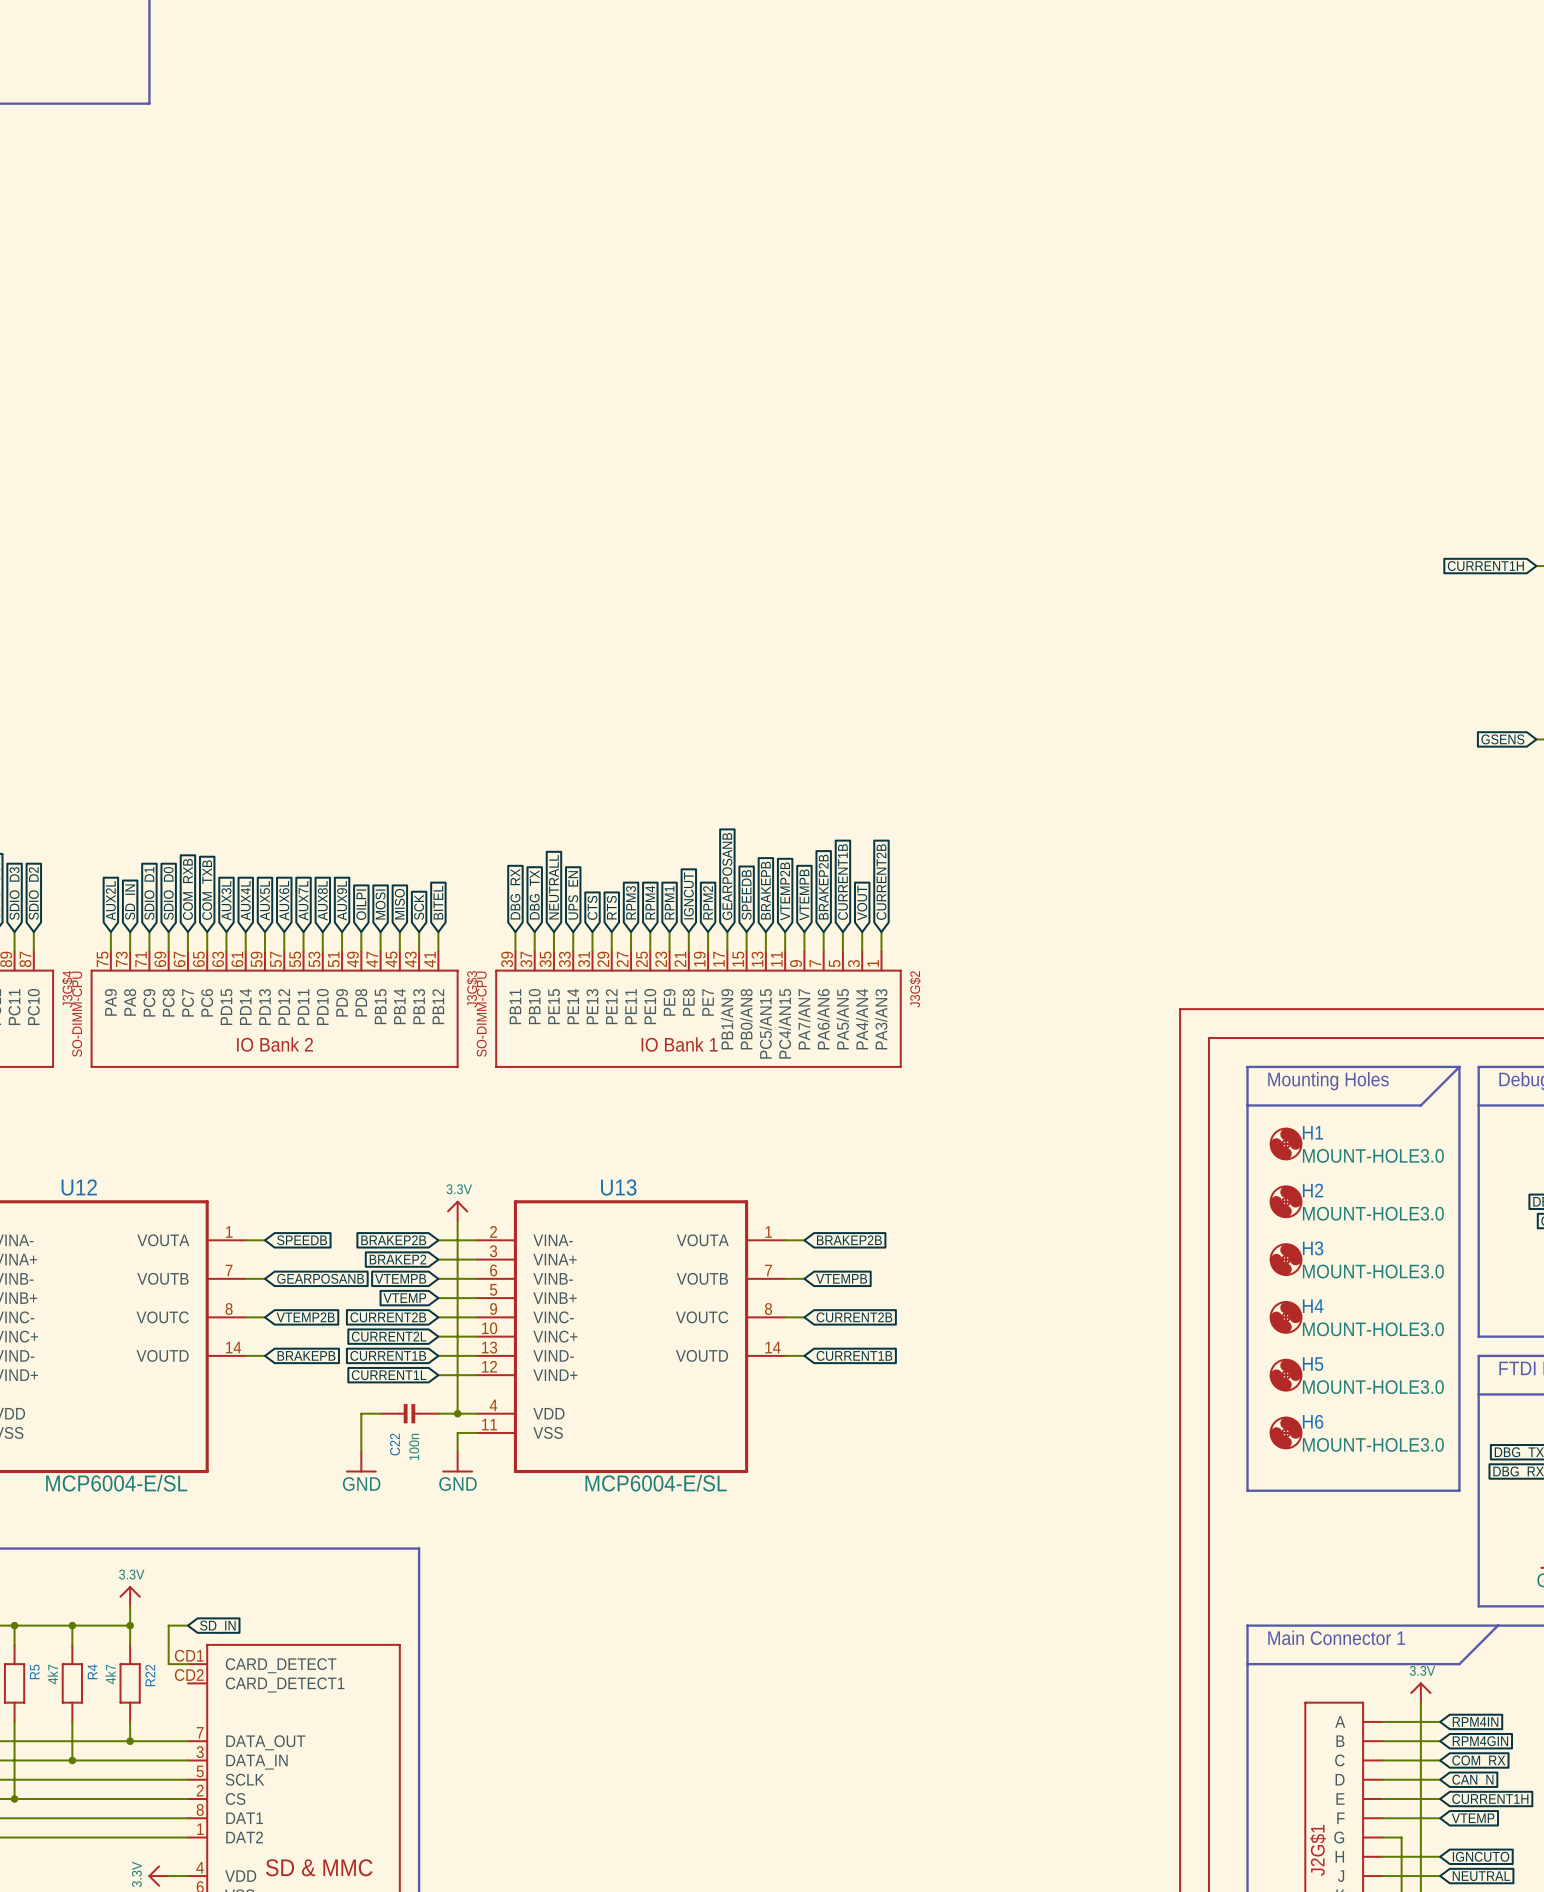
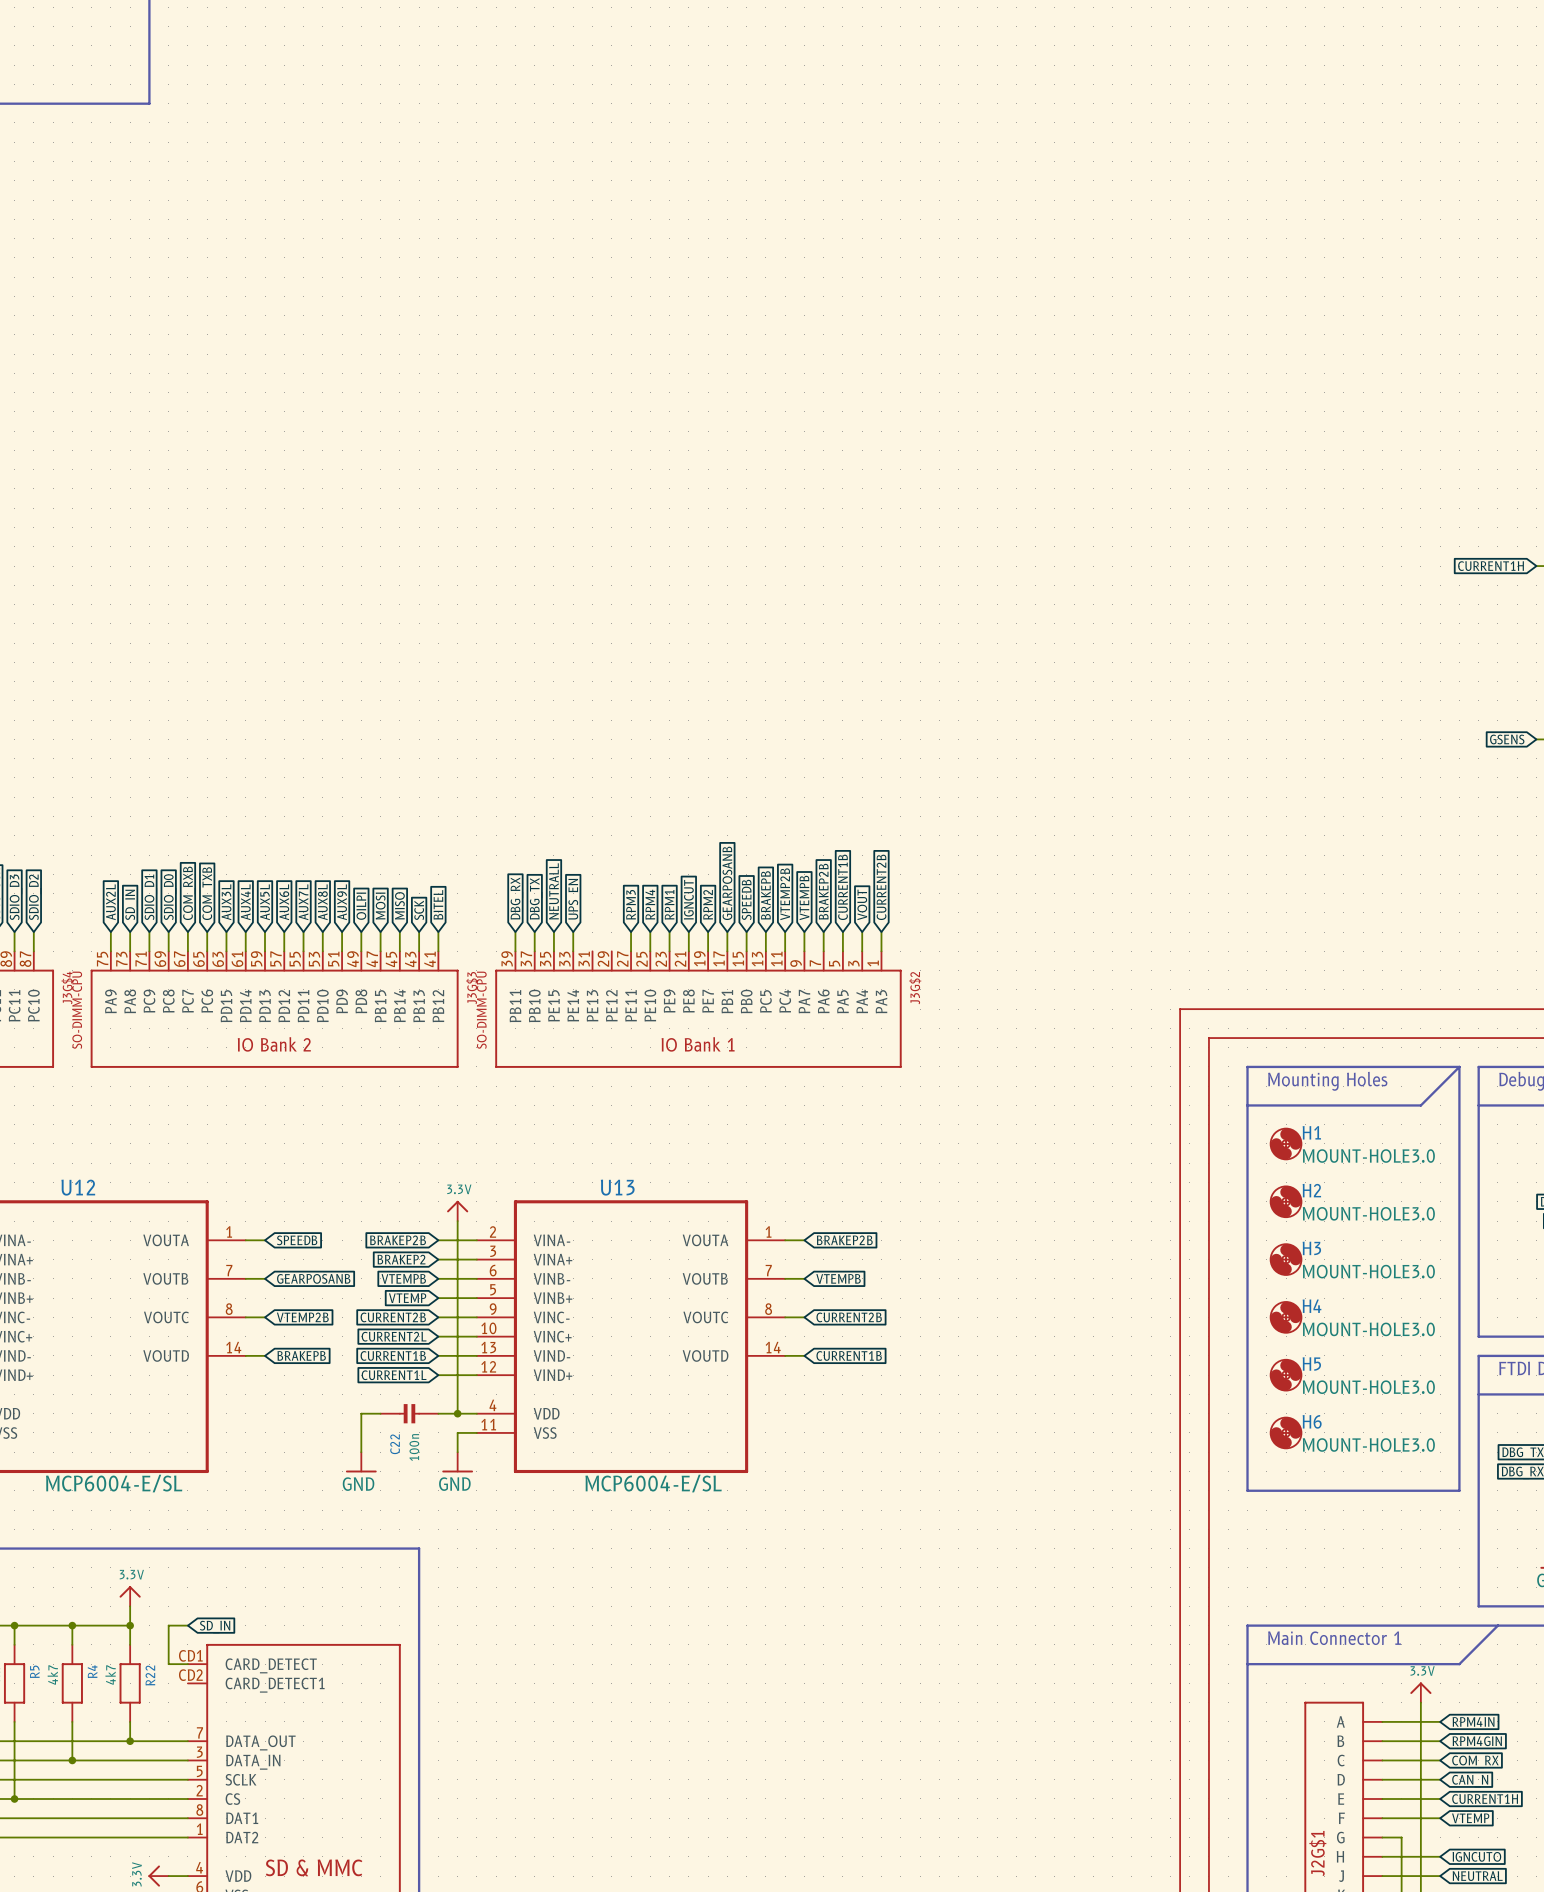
global label: CTS (592, 907) -> none
global label: RTS (611, 907) -> none
wire: (592, 932) (592, 951) -> none
wire: (611, 932) (611, 951) -> none
J3G$2 symbol: [495, 951, 902, 1068] -> [495, 951, 902, 1068]

